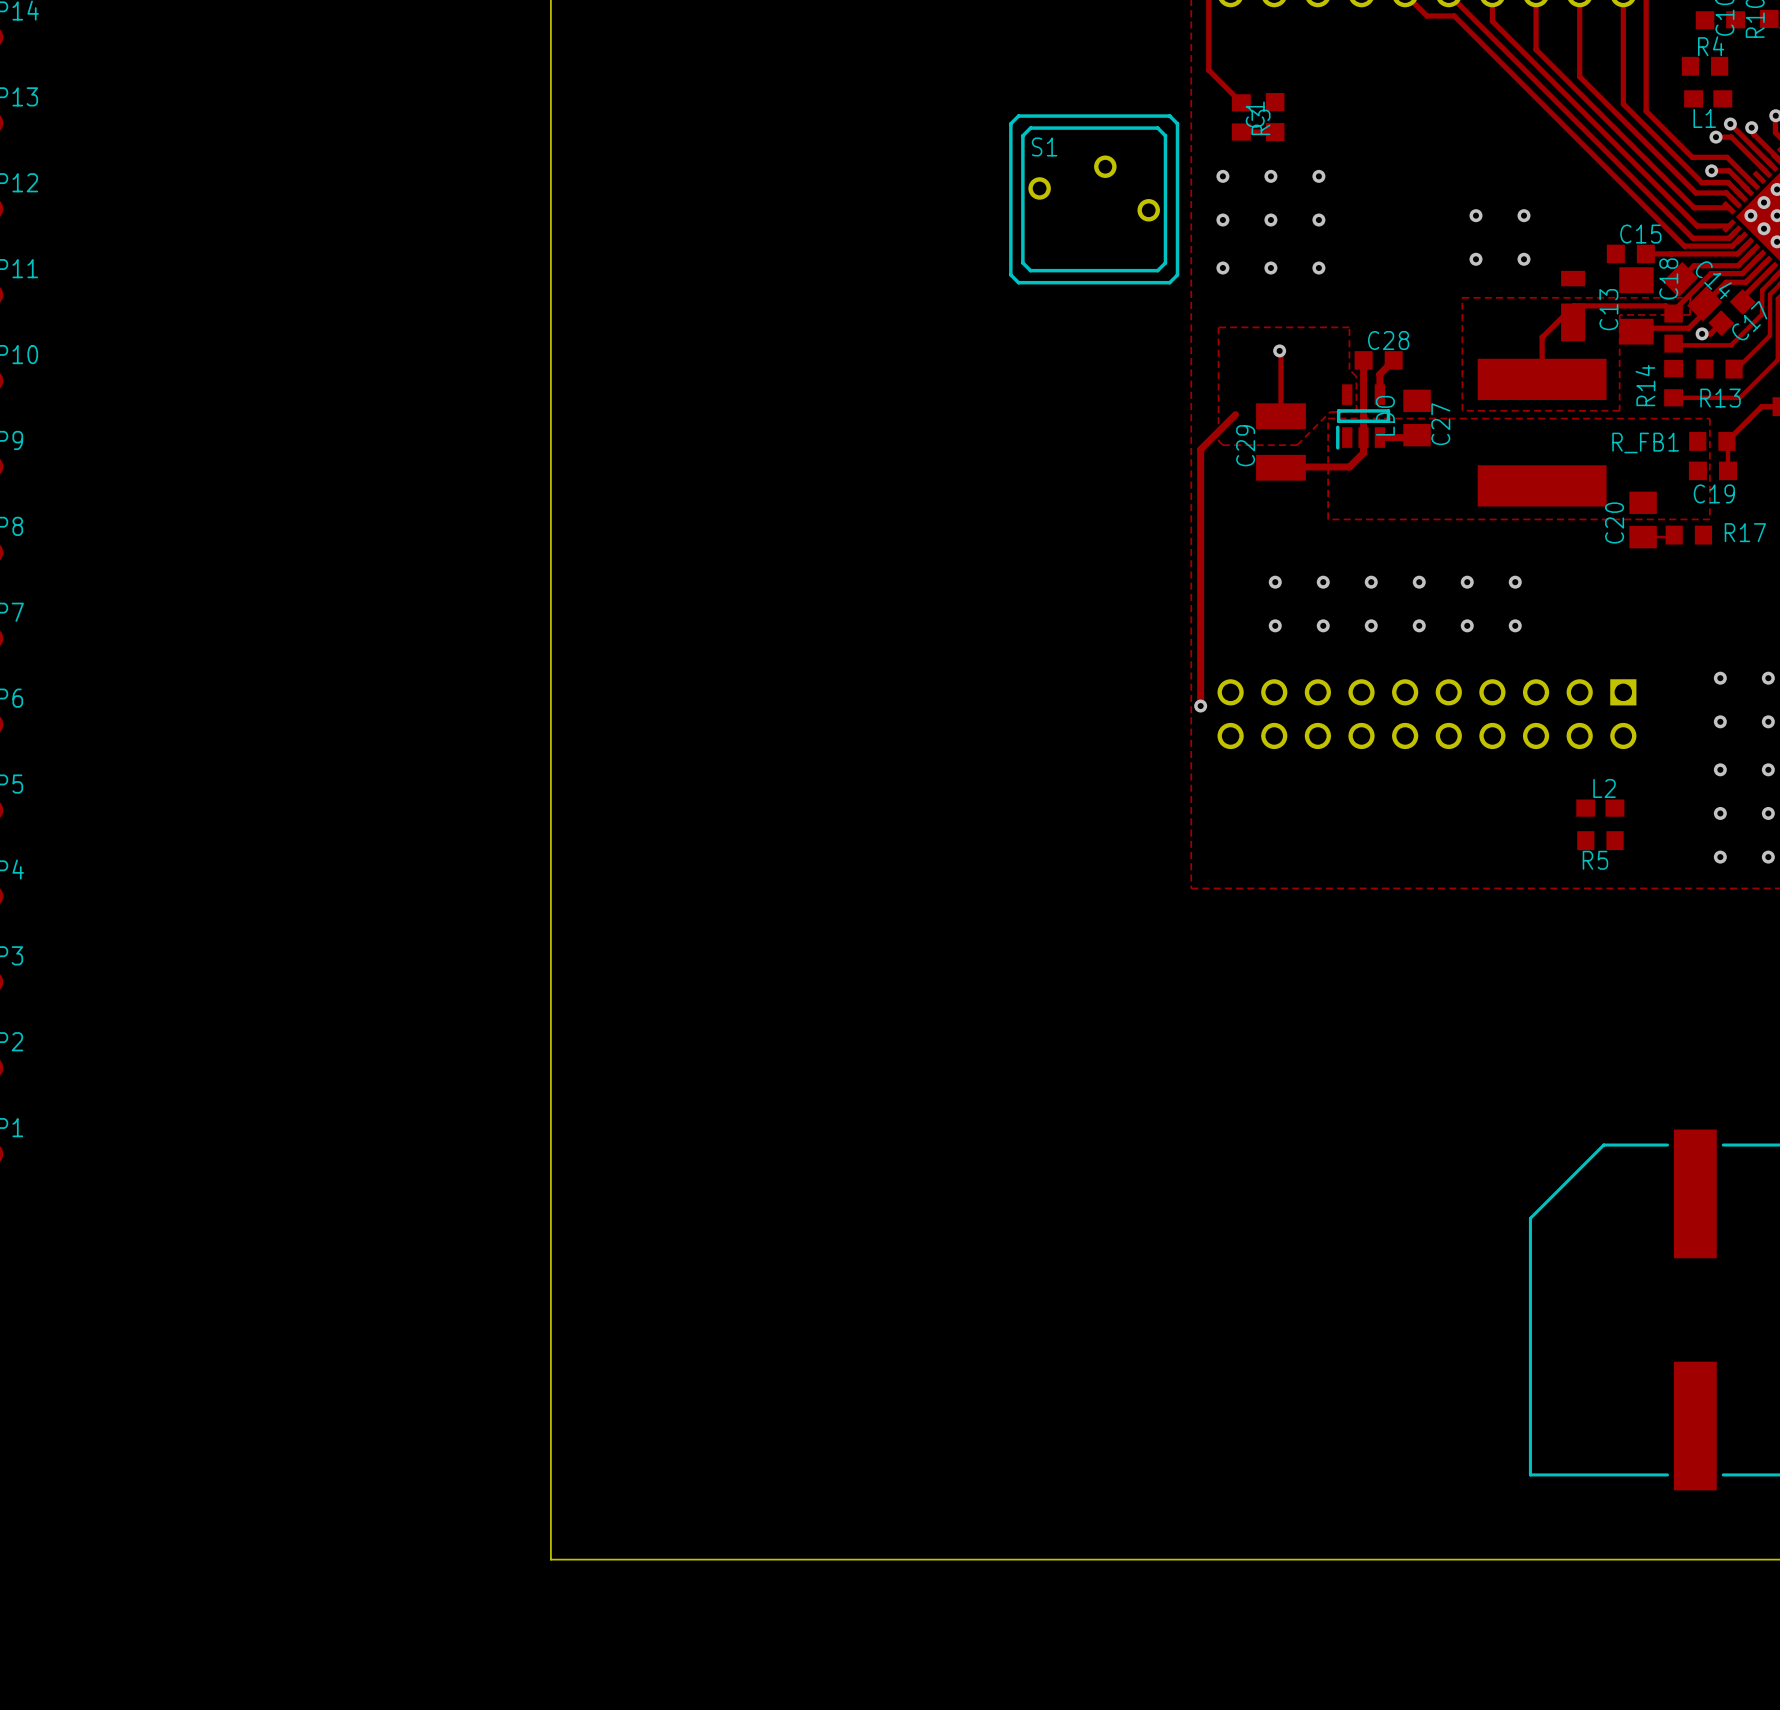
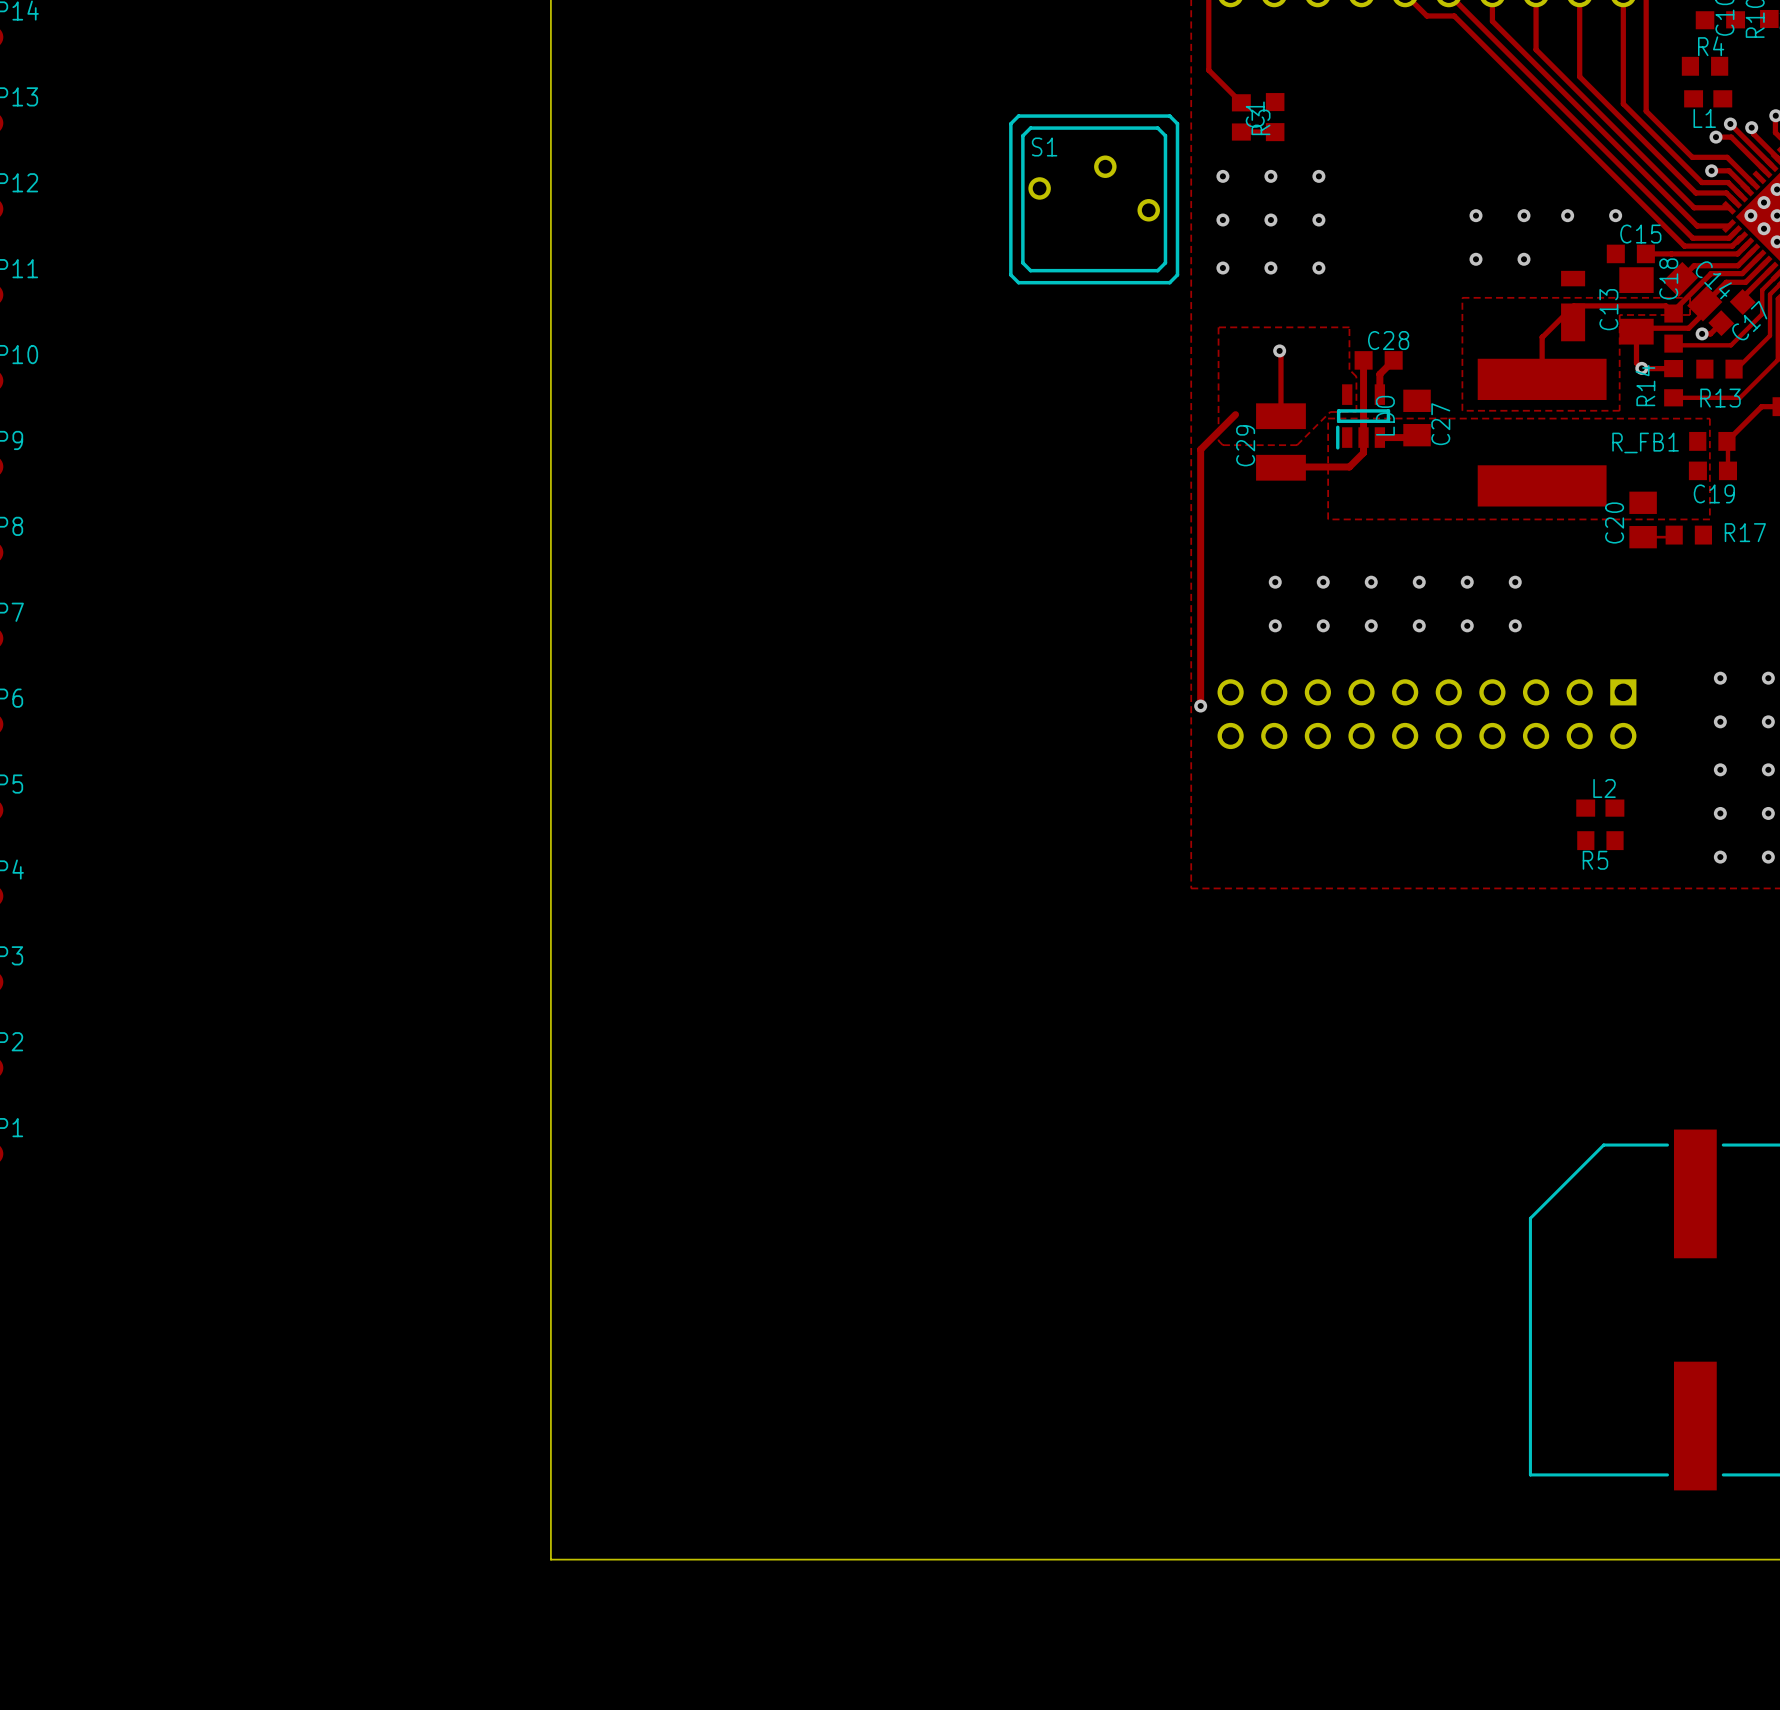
via: none -> (1567, 215)
via: none -> (1615, 215)
track: none -> (1636, 331) (1636, 363) (1642, 368) (1673, 368)
via: none -> (1641, 368)

